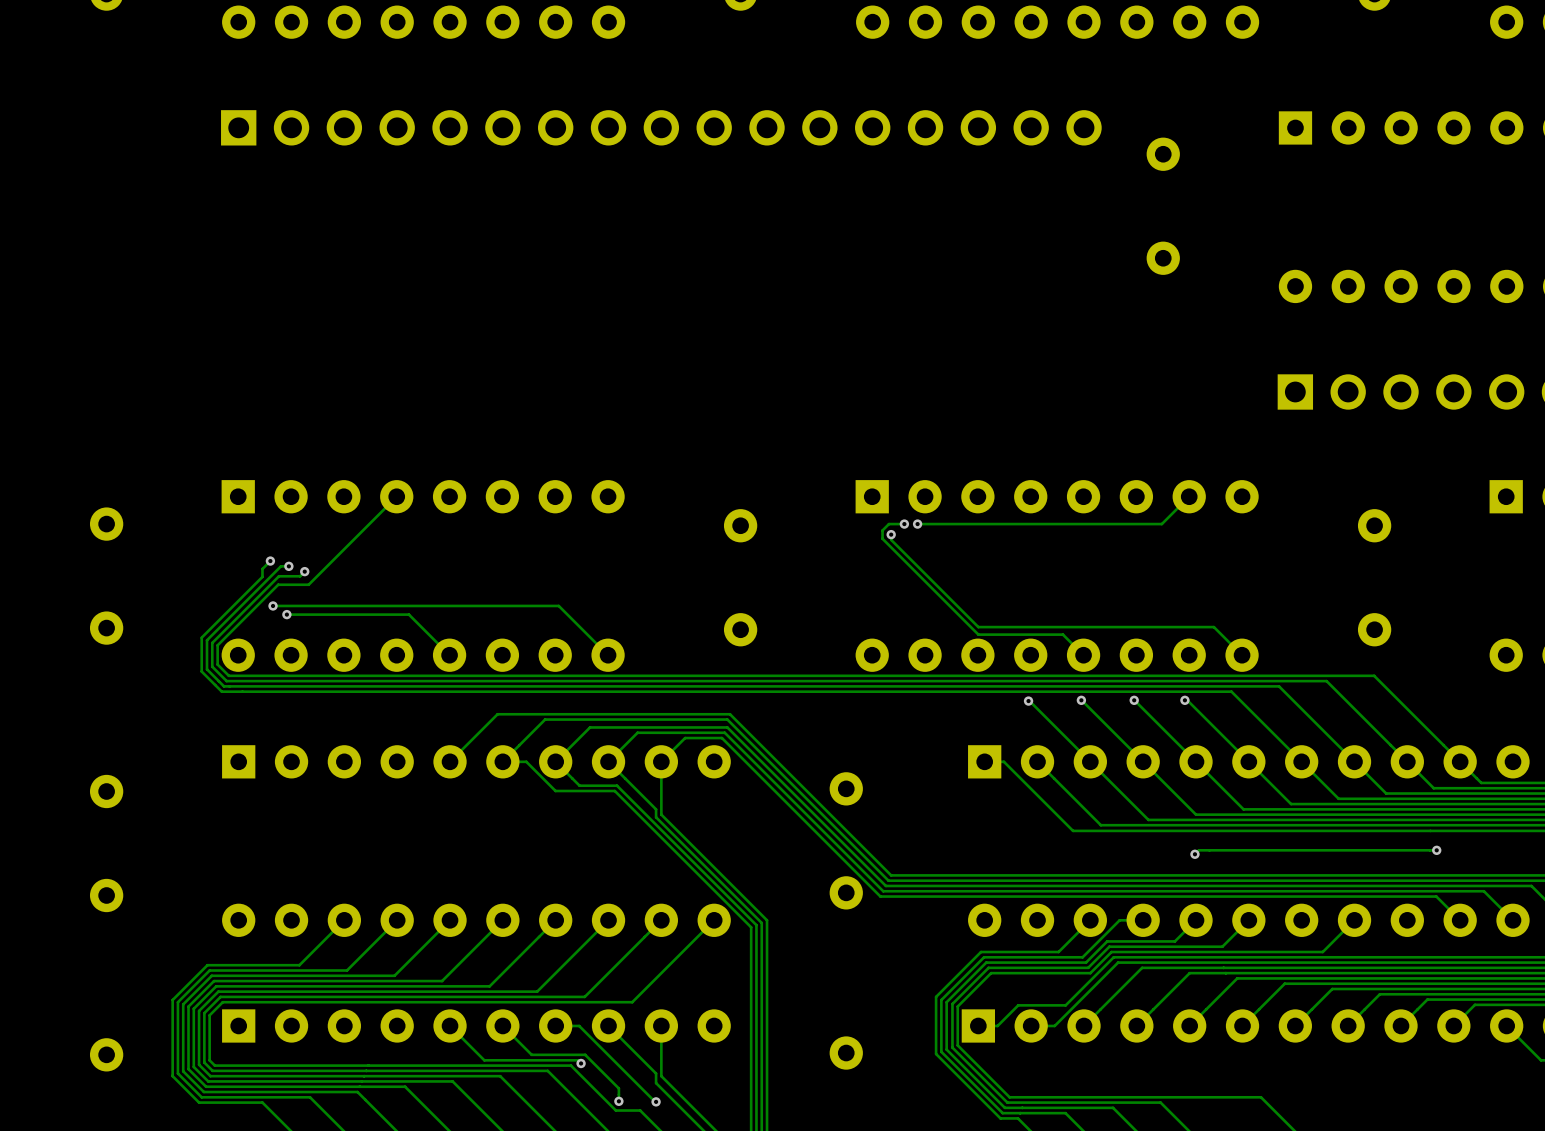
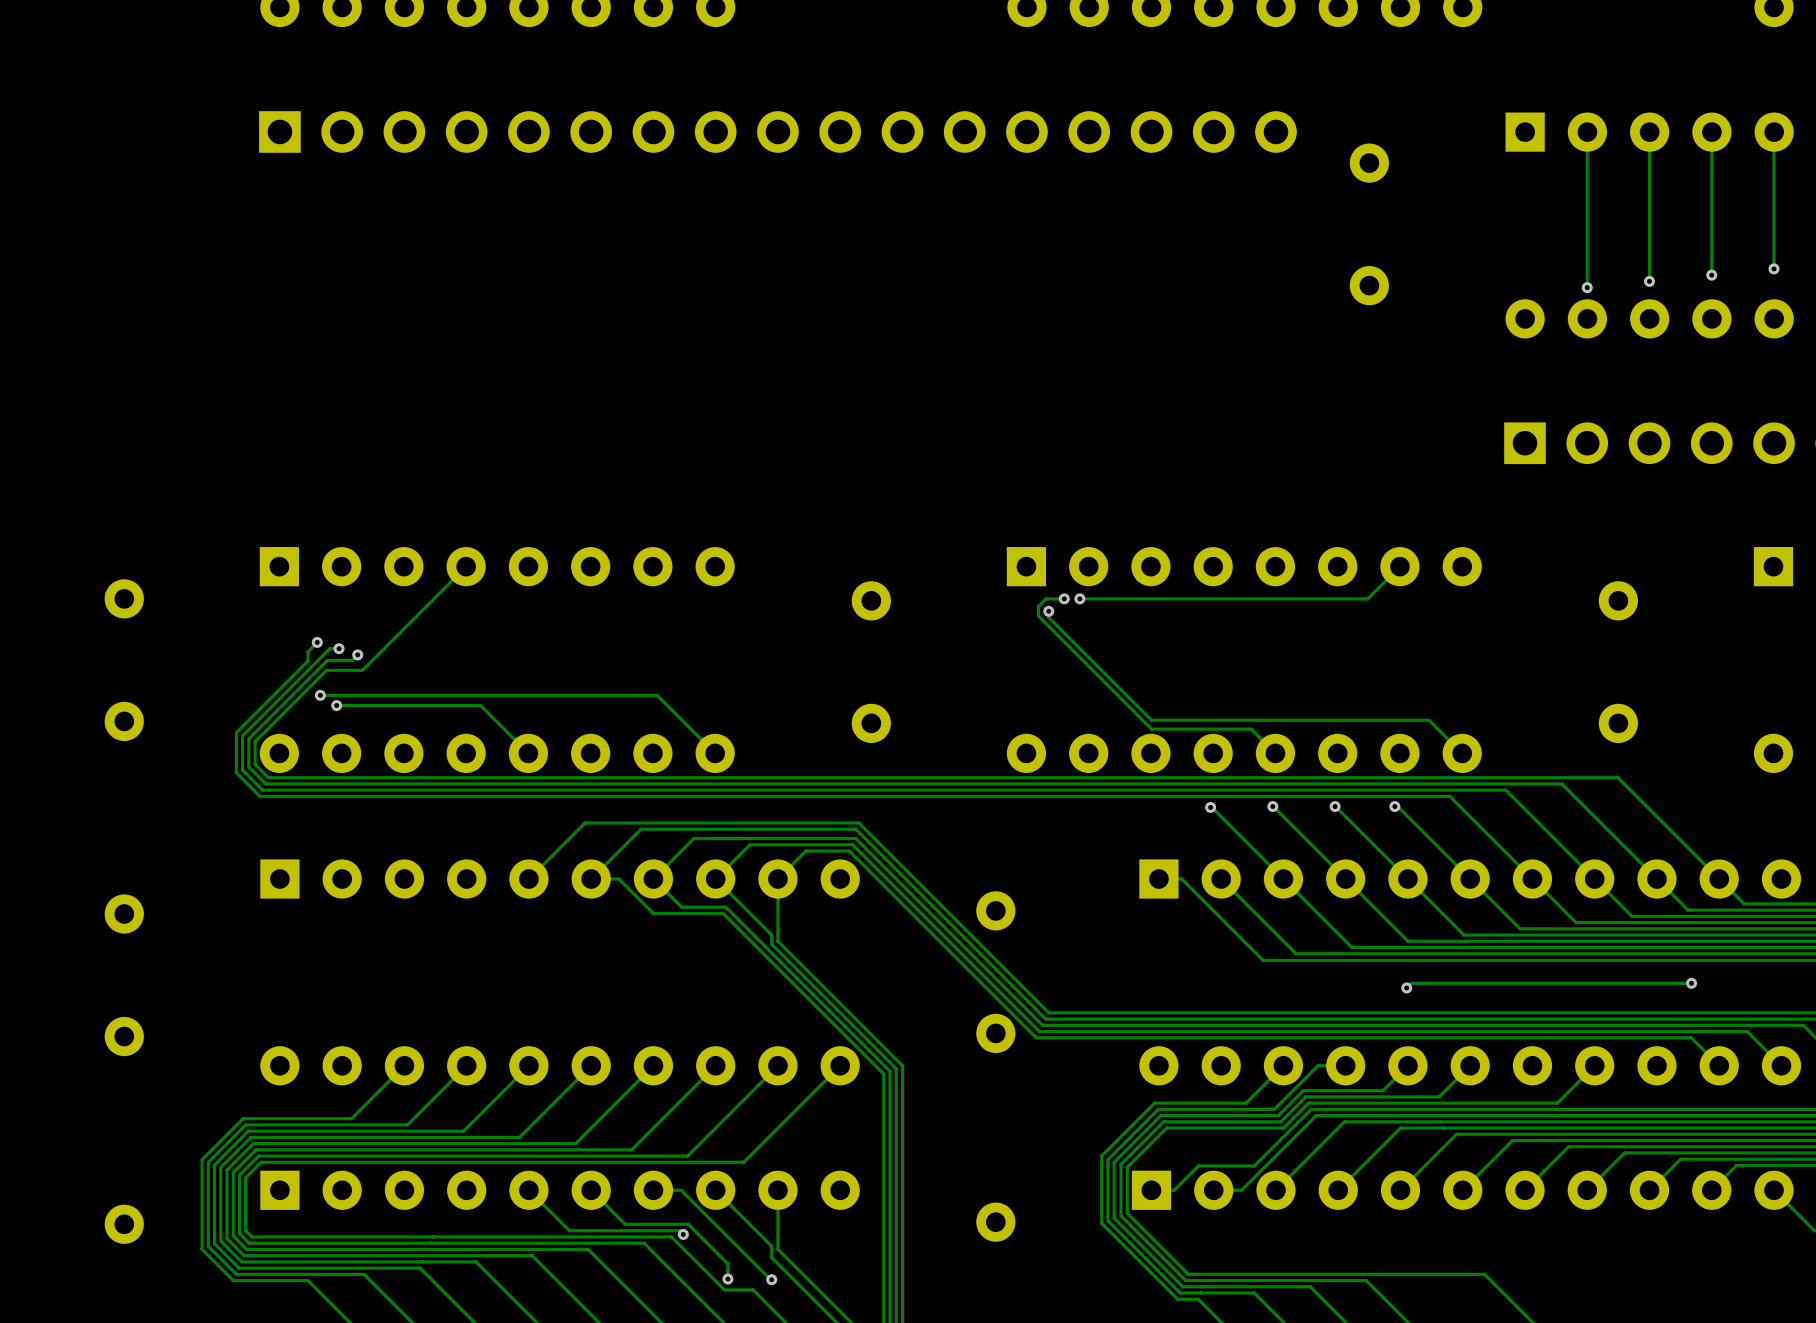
track: none -> (1587, 132) (1587, 287)
track: none -> (1649, 132) (1649, 281)
track: none -> (1711, 132) (1711, 275)
track: none -> (1774, 132) (1774, 268)
via: none -> (1774, 268)
via: none -> (1711, 275)
via: none -> (1649, 281)
via: none -> (1587, 287)

